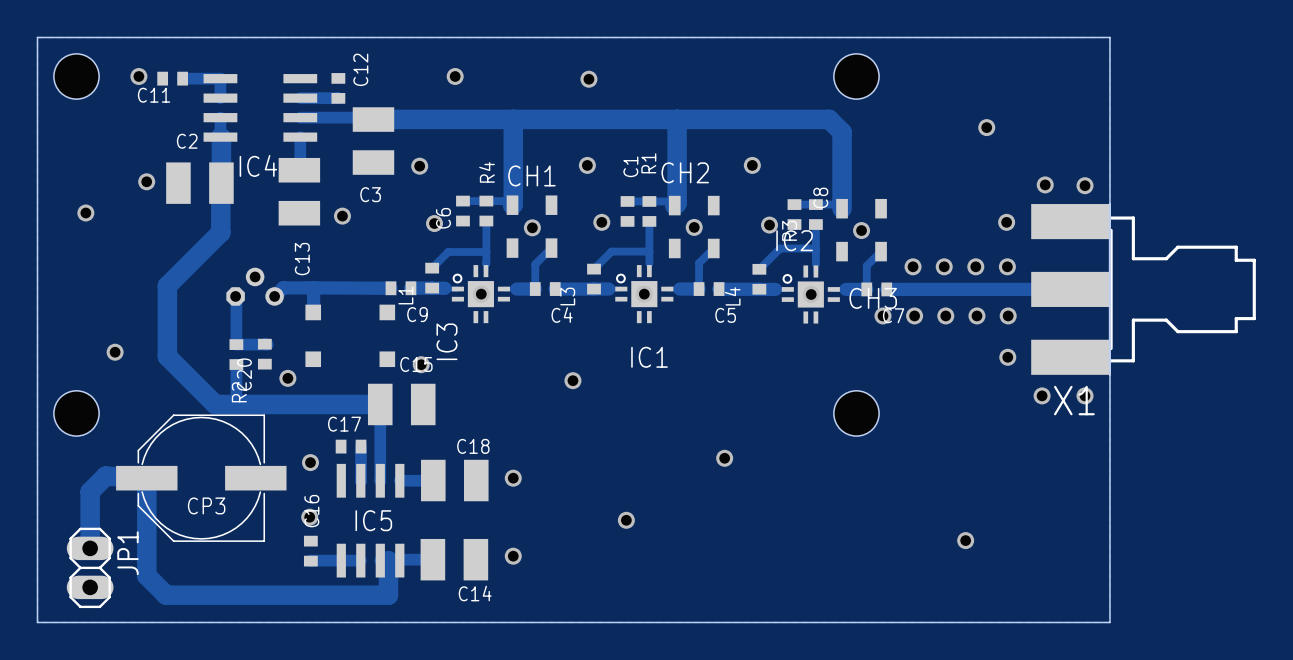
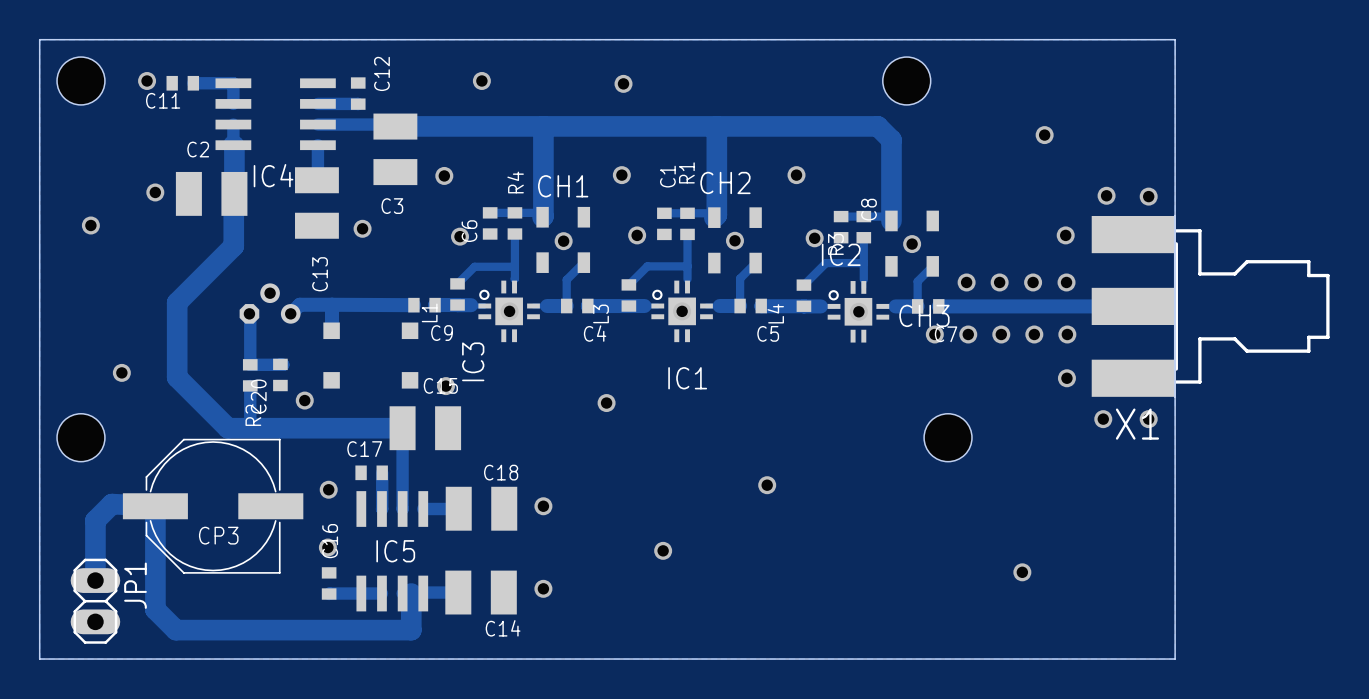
hole position: (856, 413) -> (948, 437)

